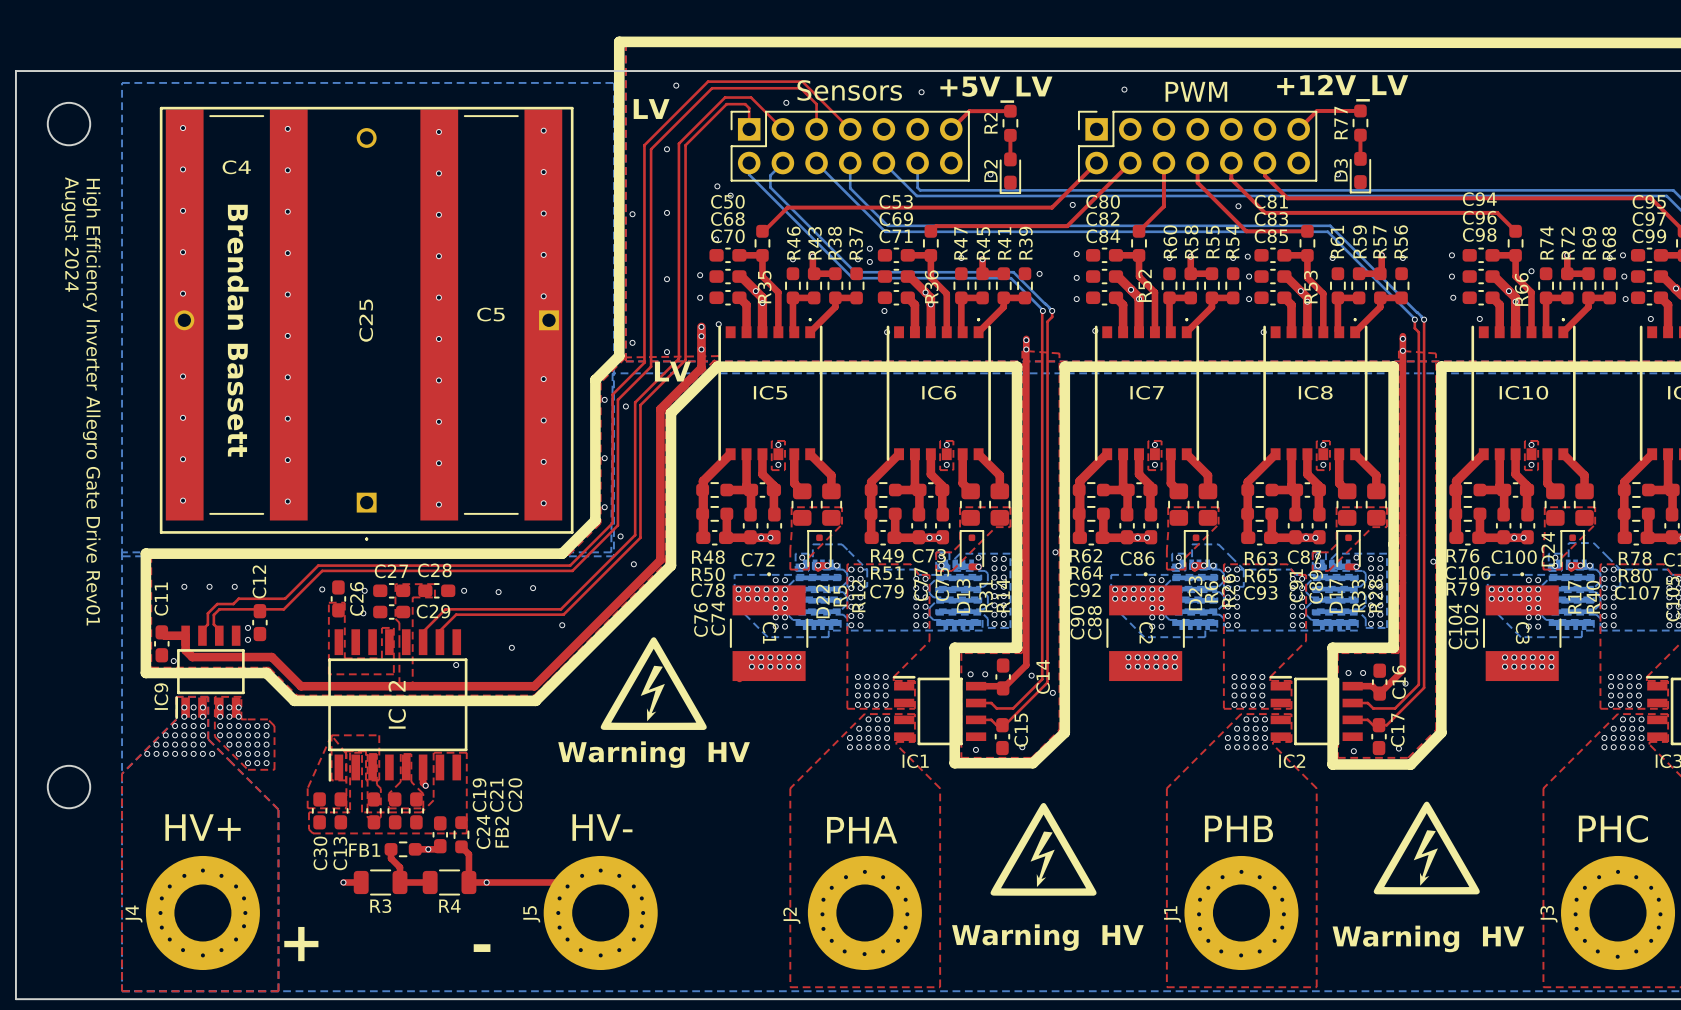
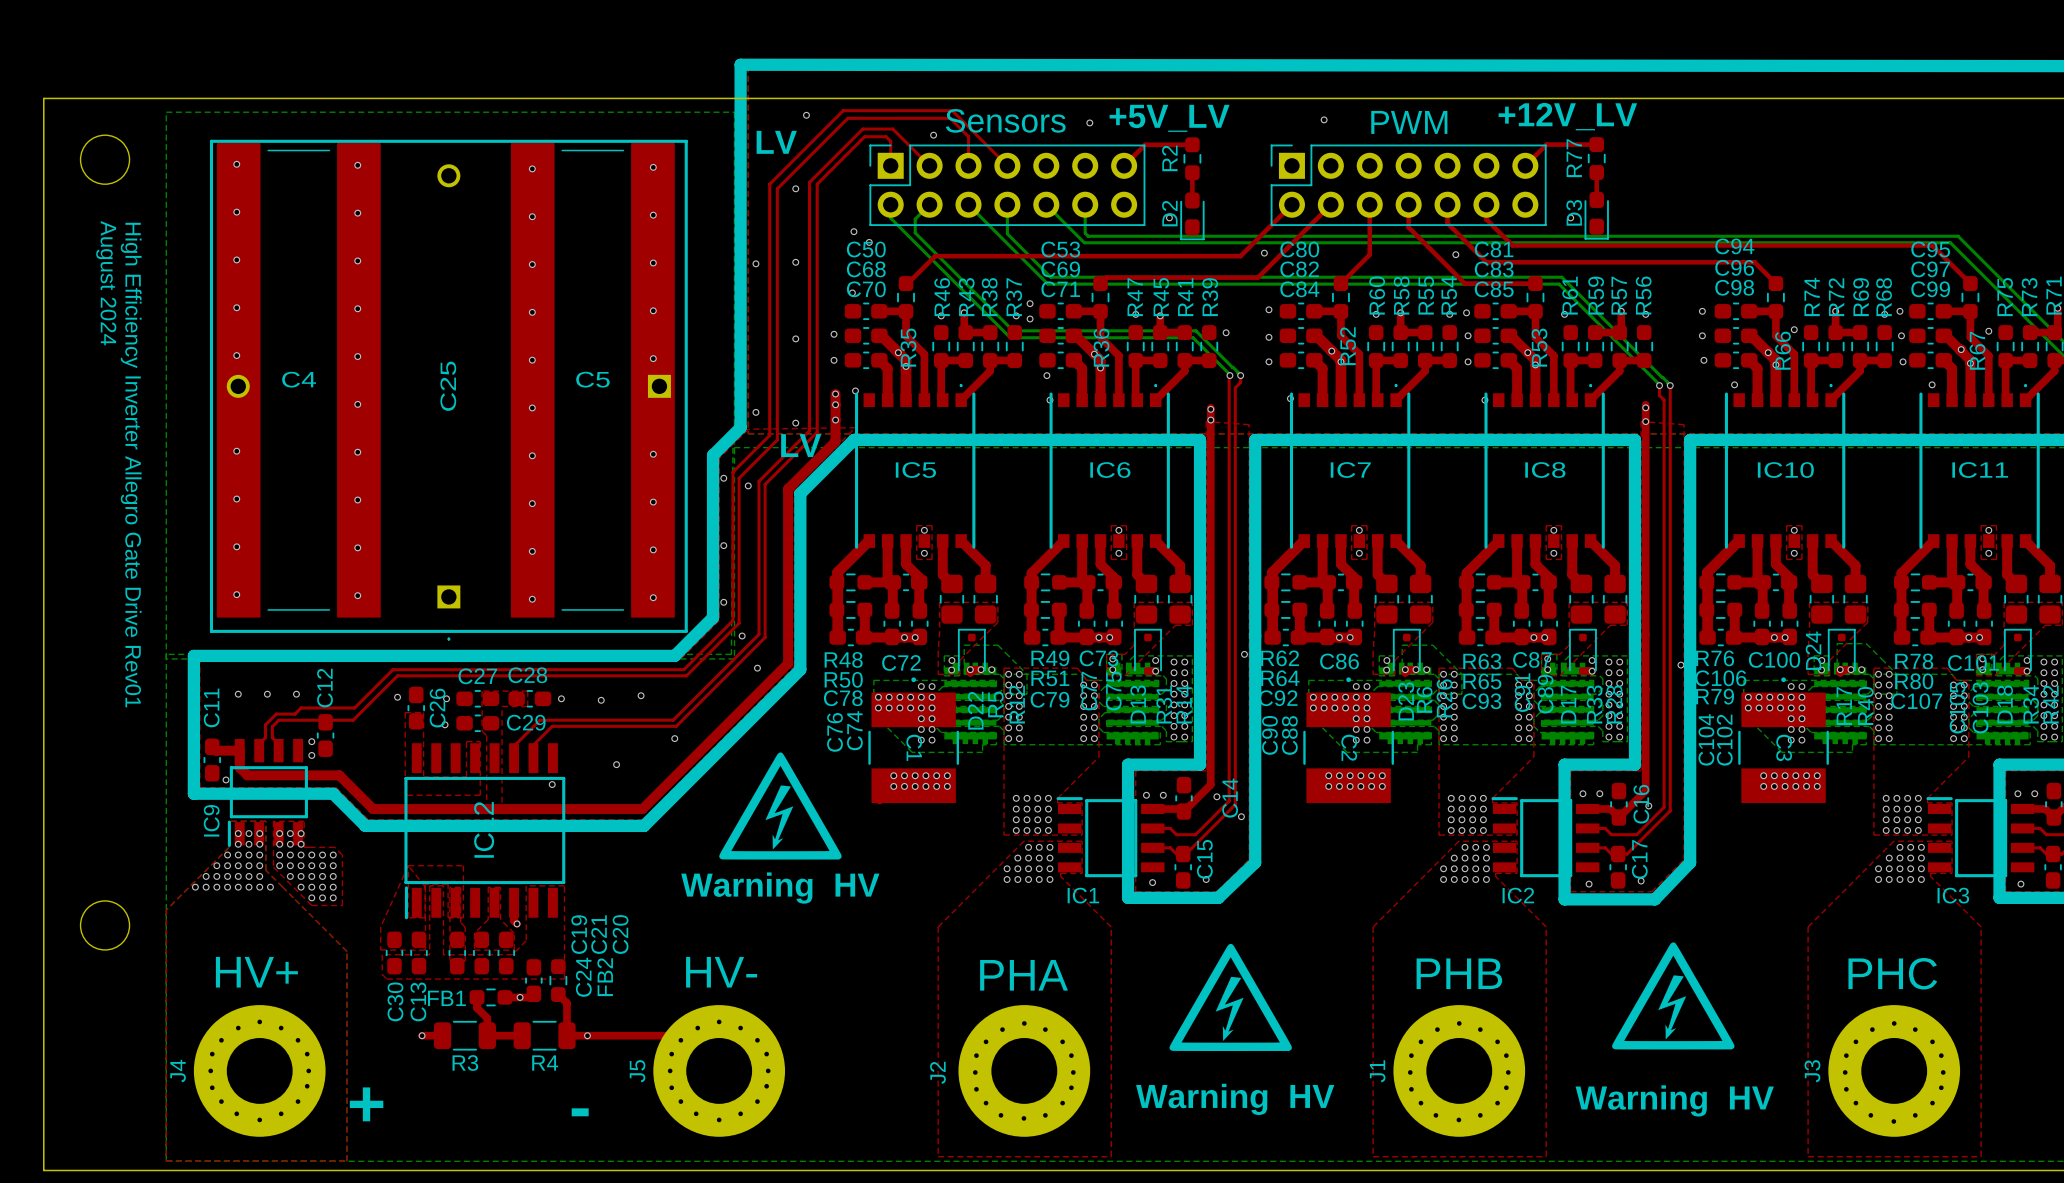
C4 name position: C4 (236, 167) -> C4 (299, 379)
text: Brendan Bassett (238, 330) -> none

